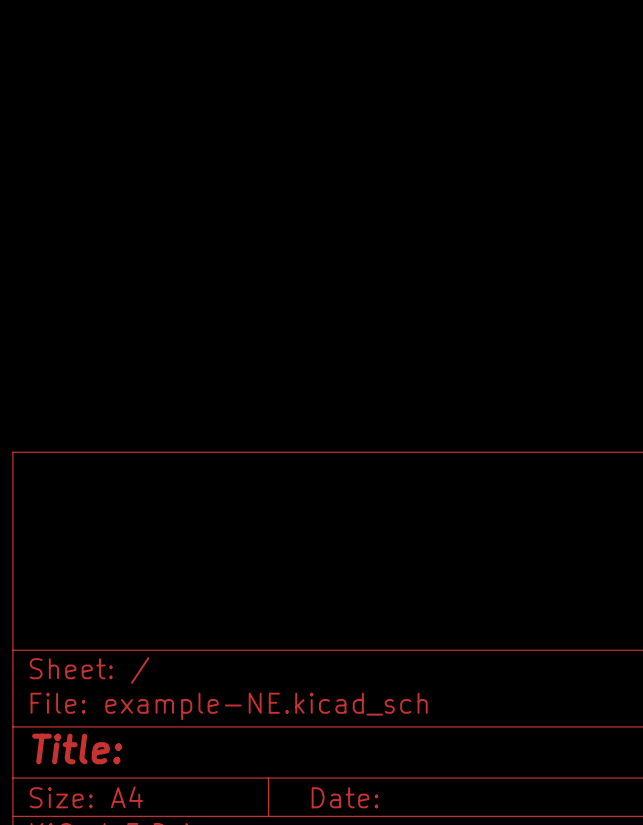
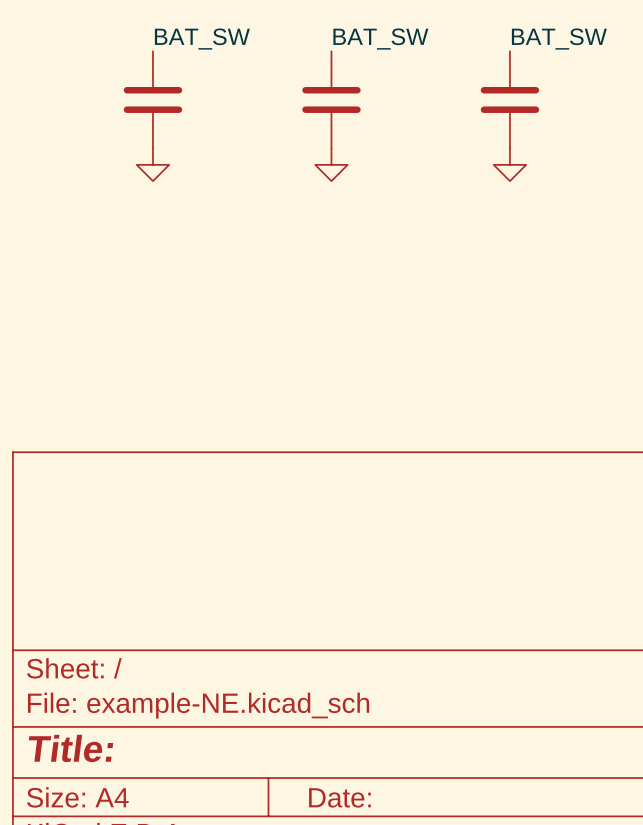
label: none -> BAT_SW (202, 39)
label: none -> BAT_SW (380, 39)
label: none -> BAT_SW (559, 39)
part: none -> (152, 99)
part: none -> (331, 99)
part: none -> (509, 99)
power symbol: none -> (152, 164)
power symbol: none -> (331, 164)
power symbol: none -> (509, 164)

